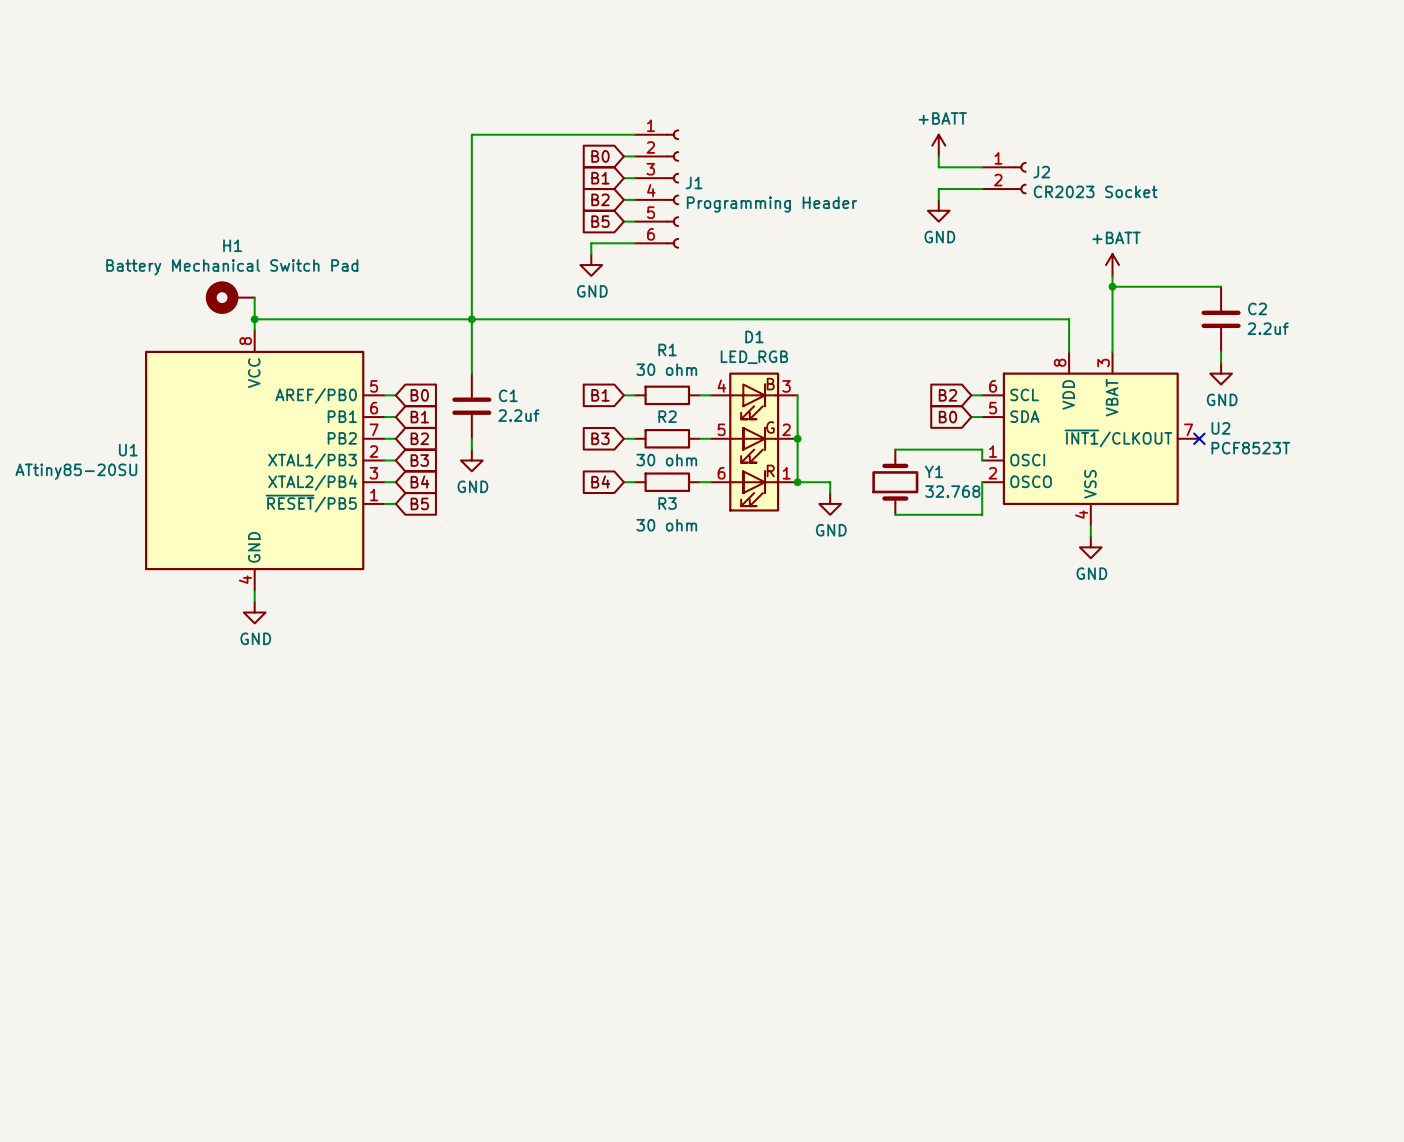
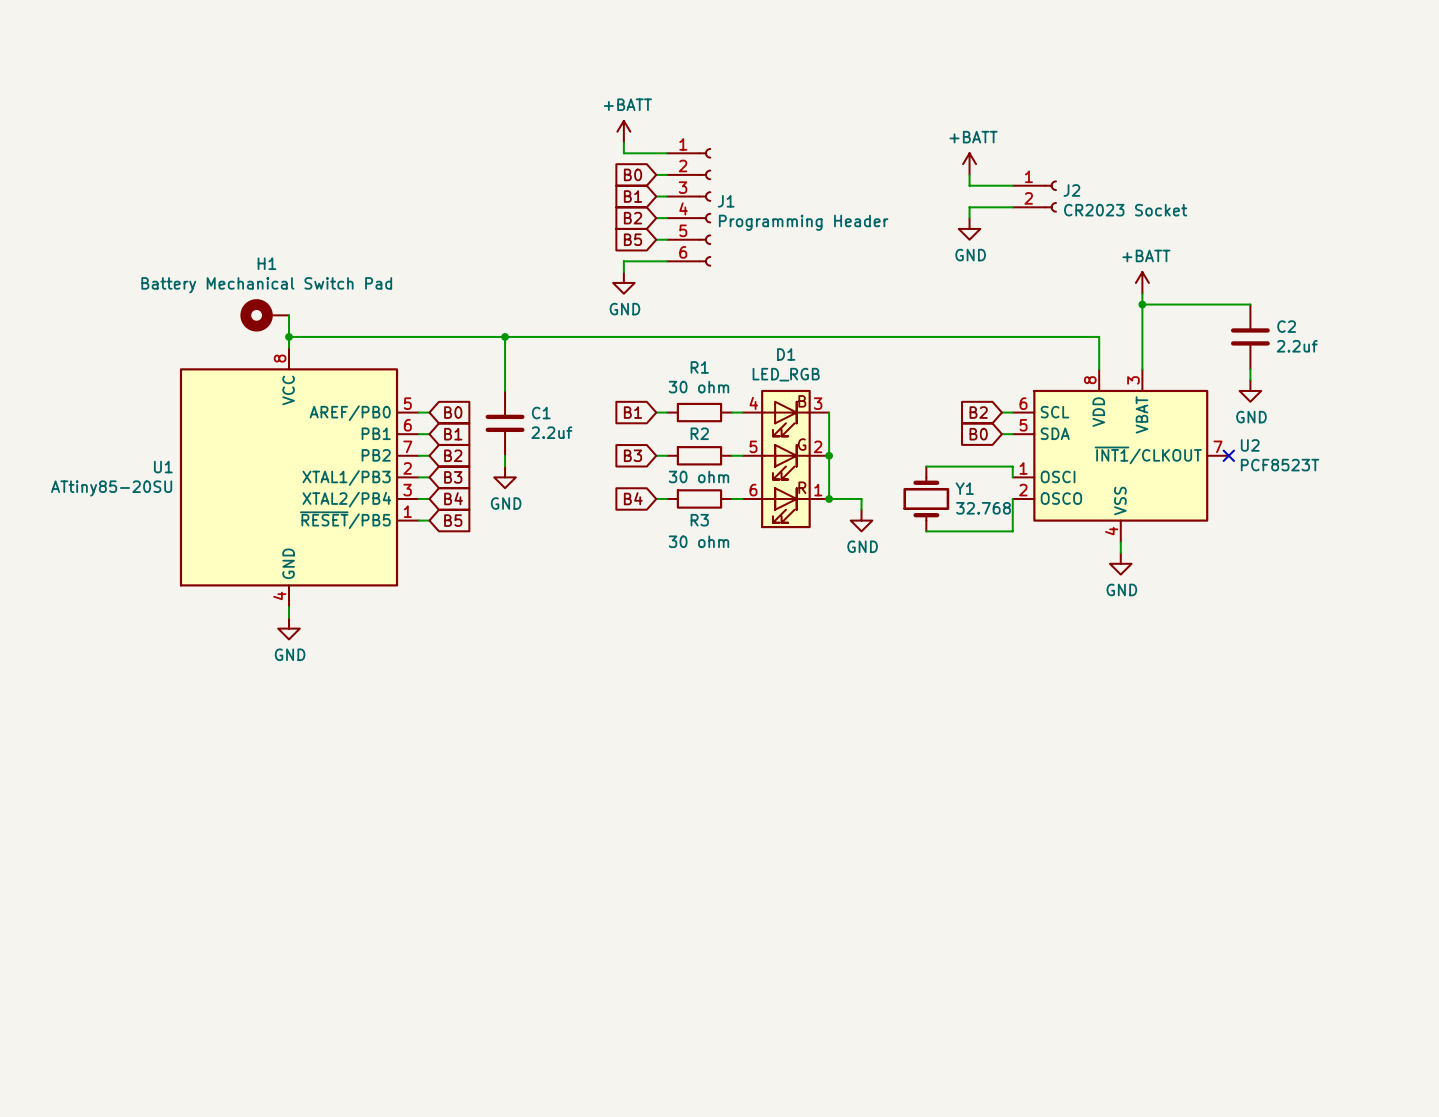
power symbol: none -> +BATT (623, 131)
wire: (591, 134) (471, 134) (471, 319) -> (623, 153) (623, 142)

